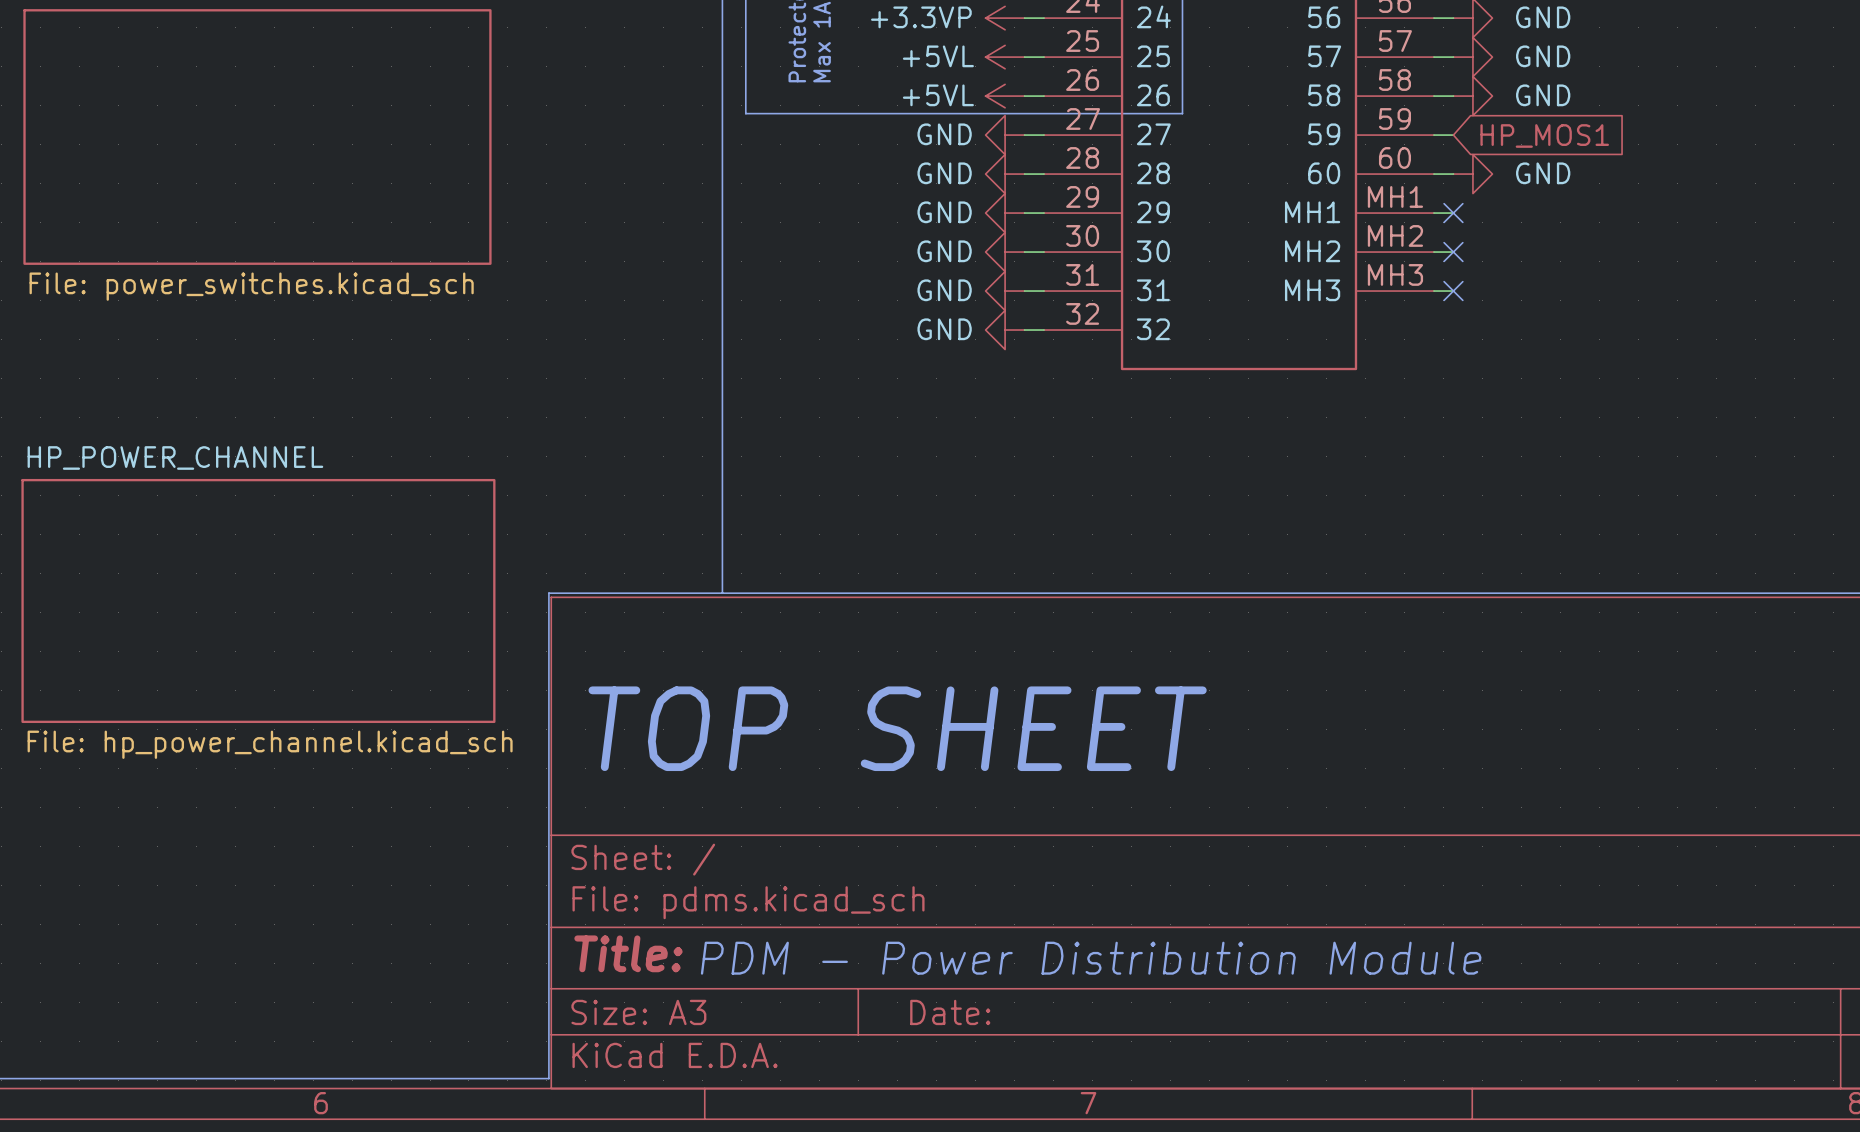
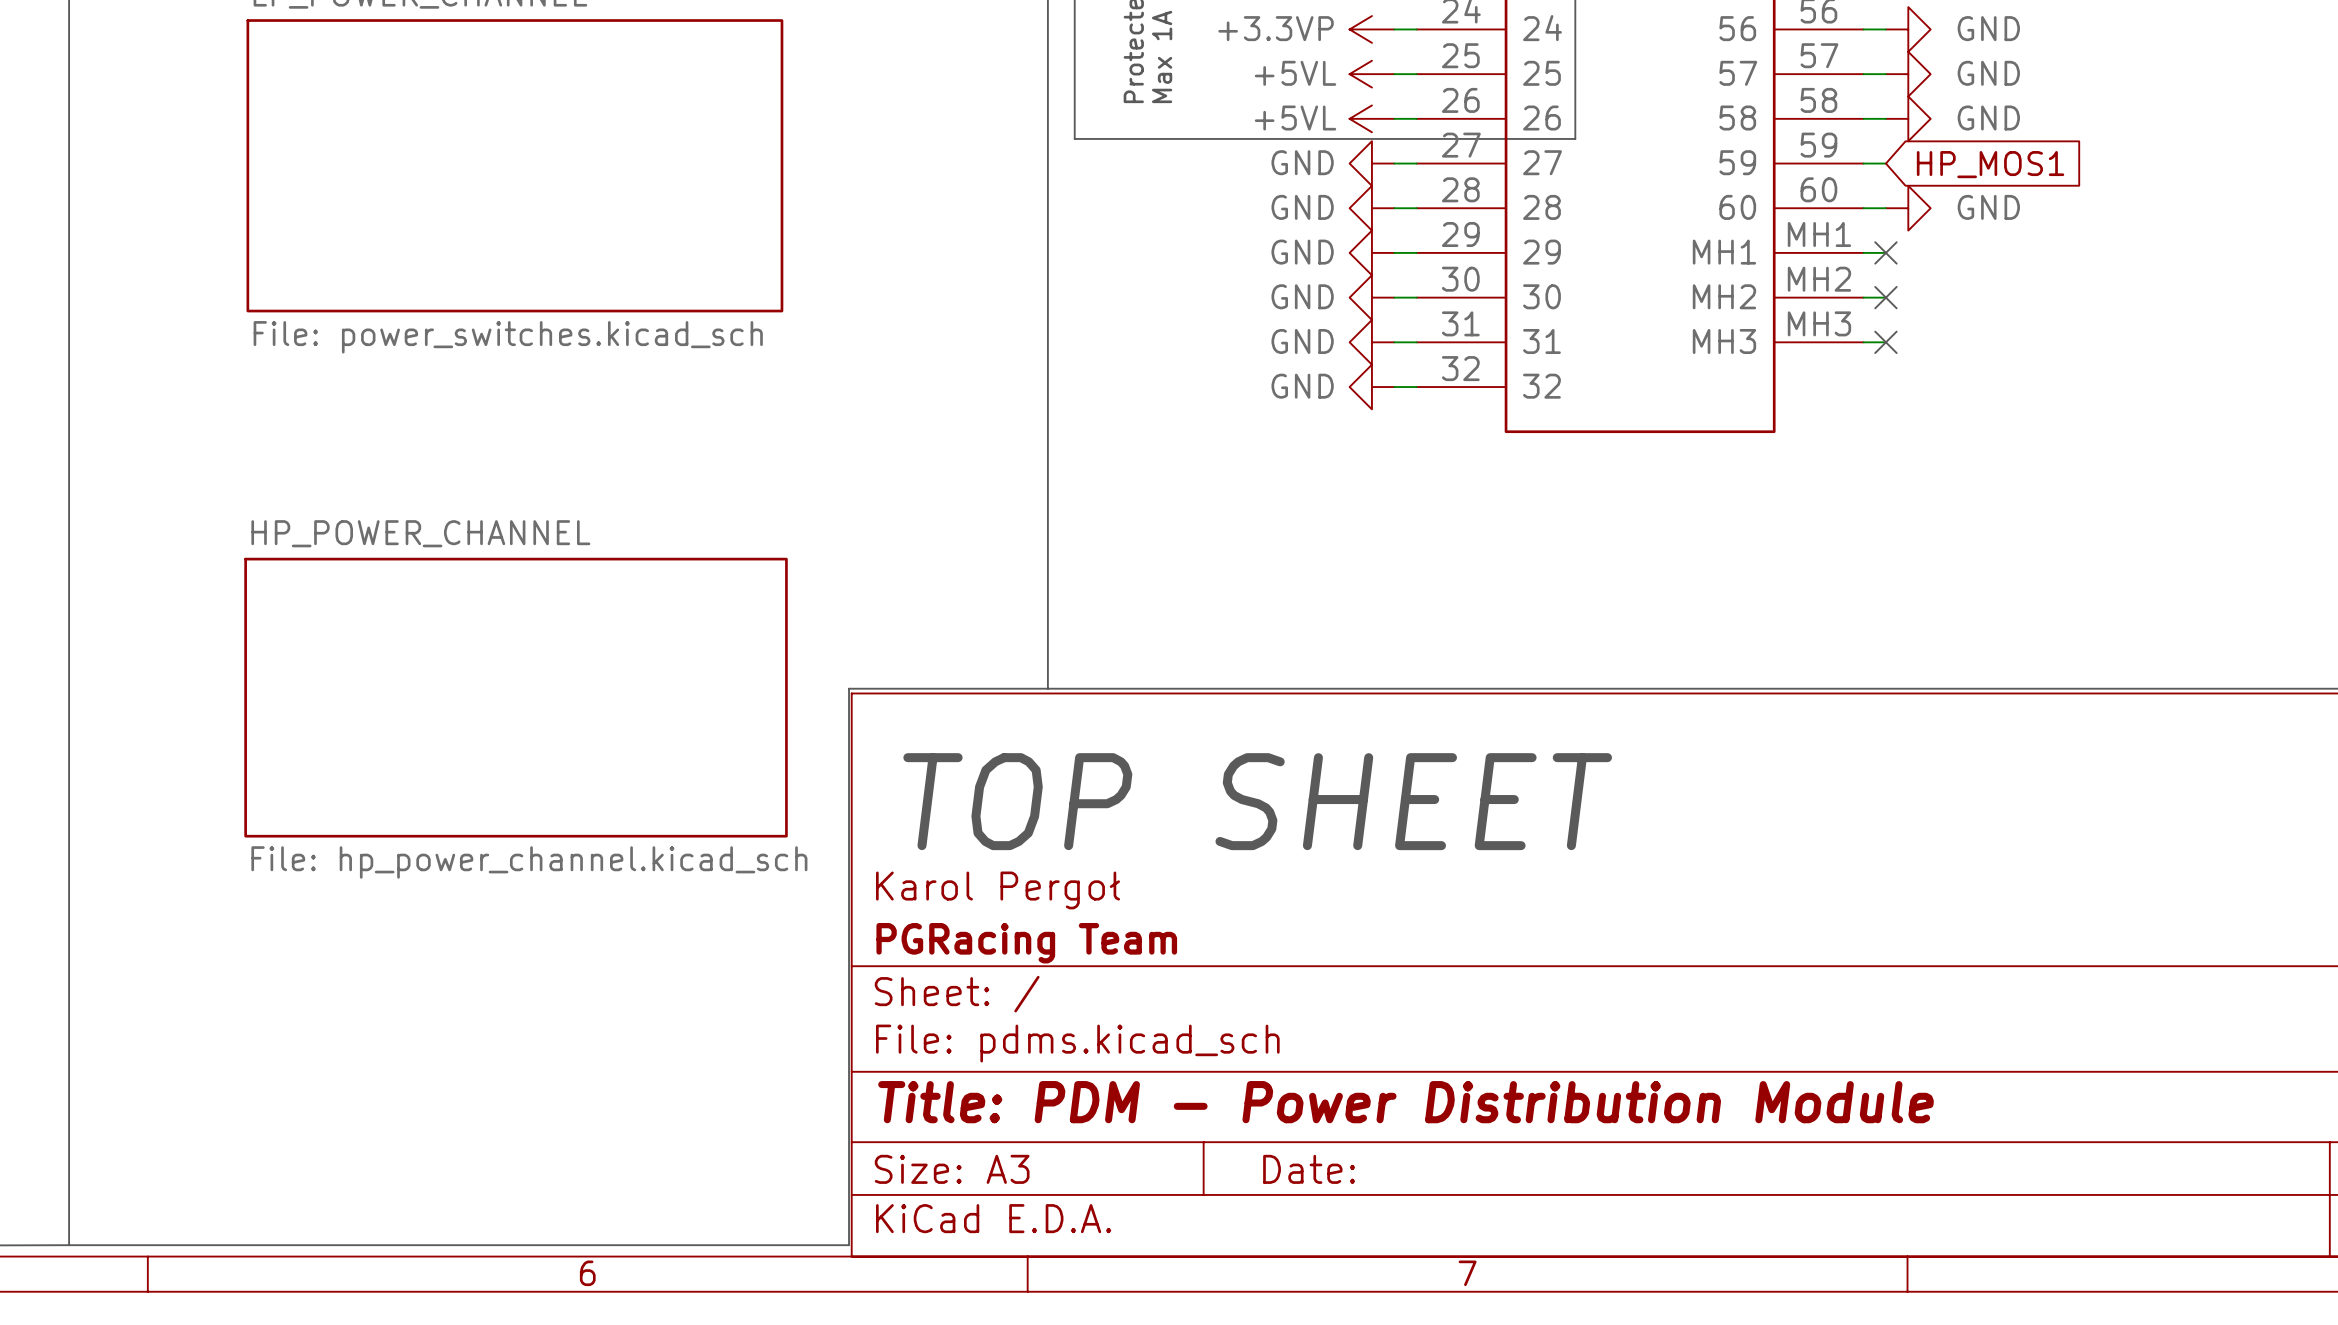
text position: TOP SHEET (897, 728) -> TOP SHEET (1257, 801)
title block: none -> Karol Pergoł (998, 890)
title block: none -> PGRacing Team (1026, 943)
title block: Title: (628, 953) -> Title: PDM - Power Distribution Module (1406, 1102)
text: PDM - Power Distribution Module (1091, 958) -> none

